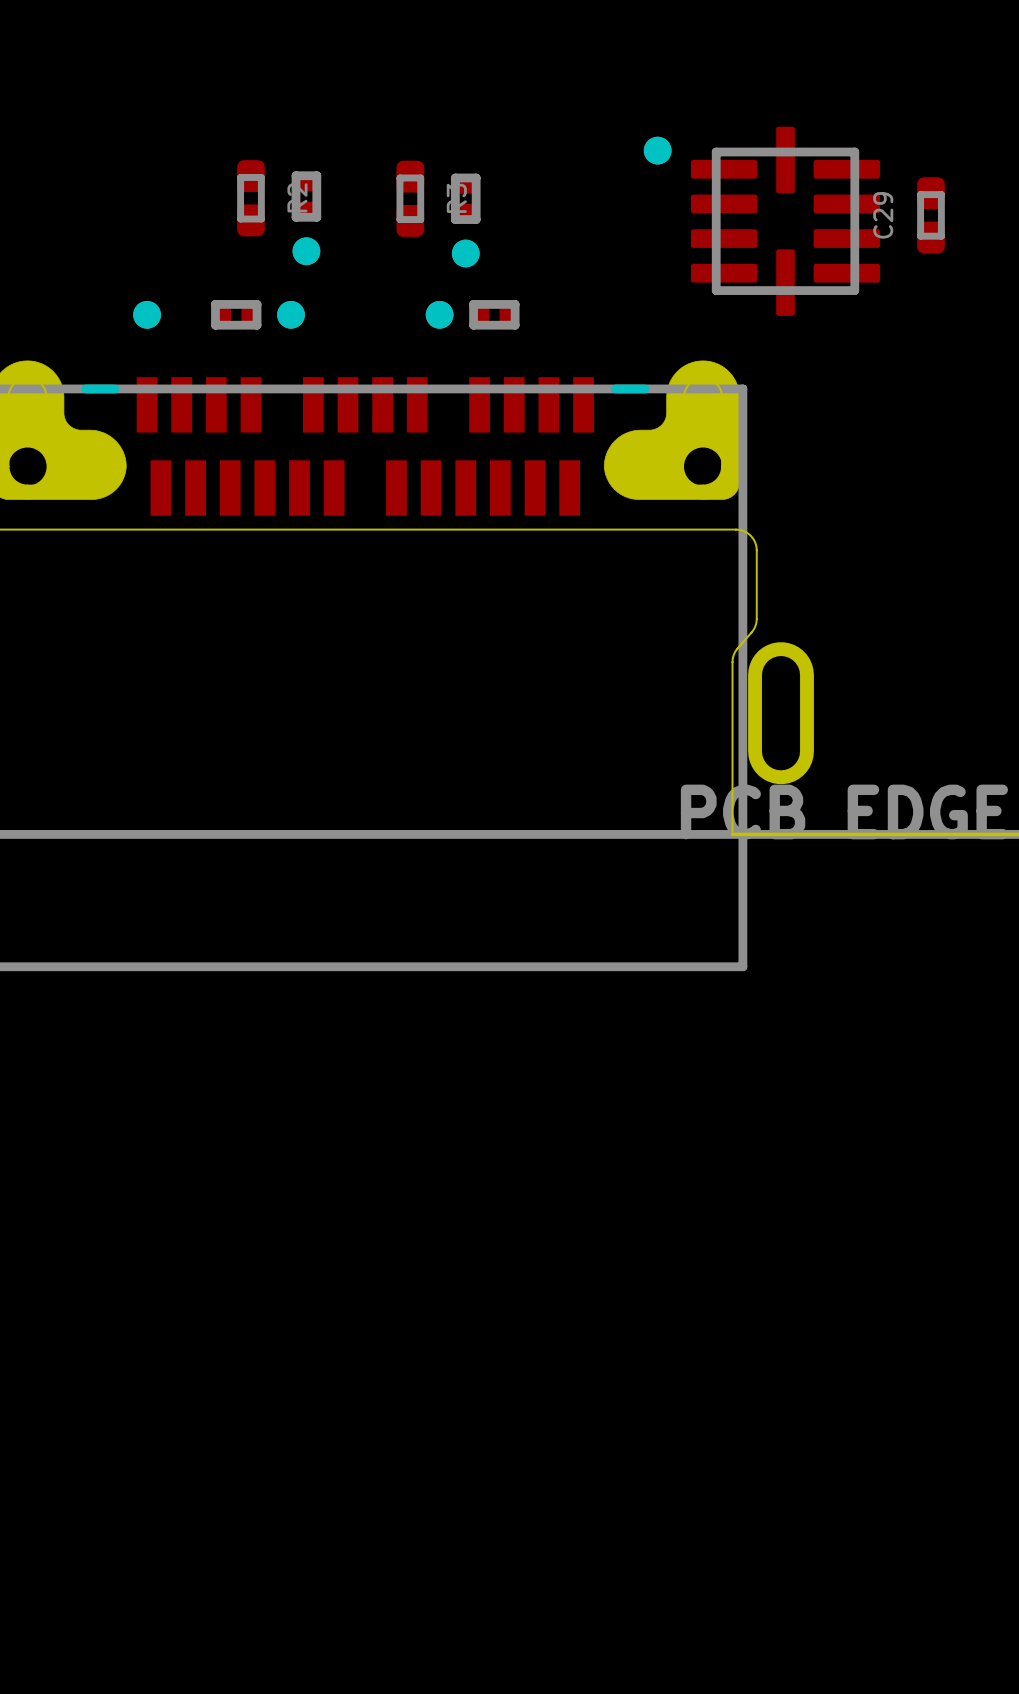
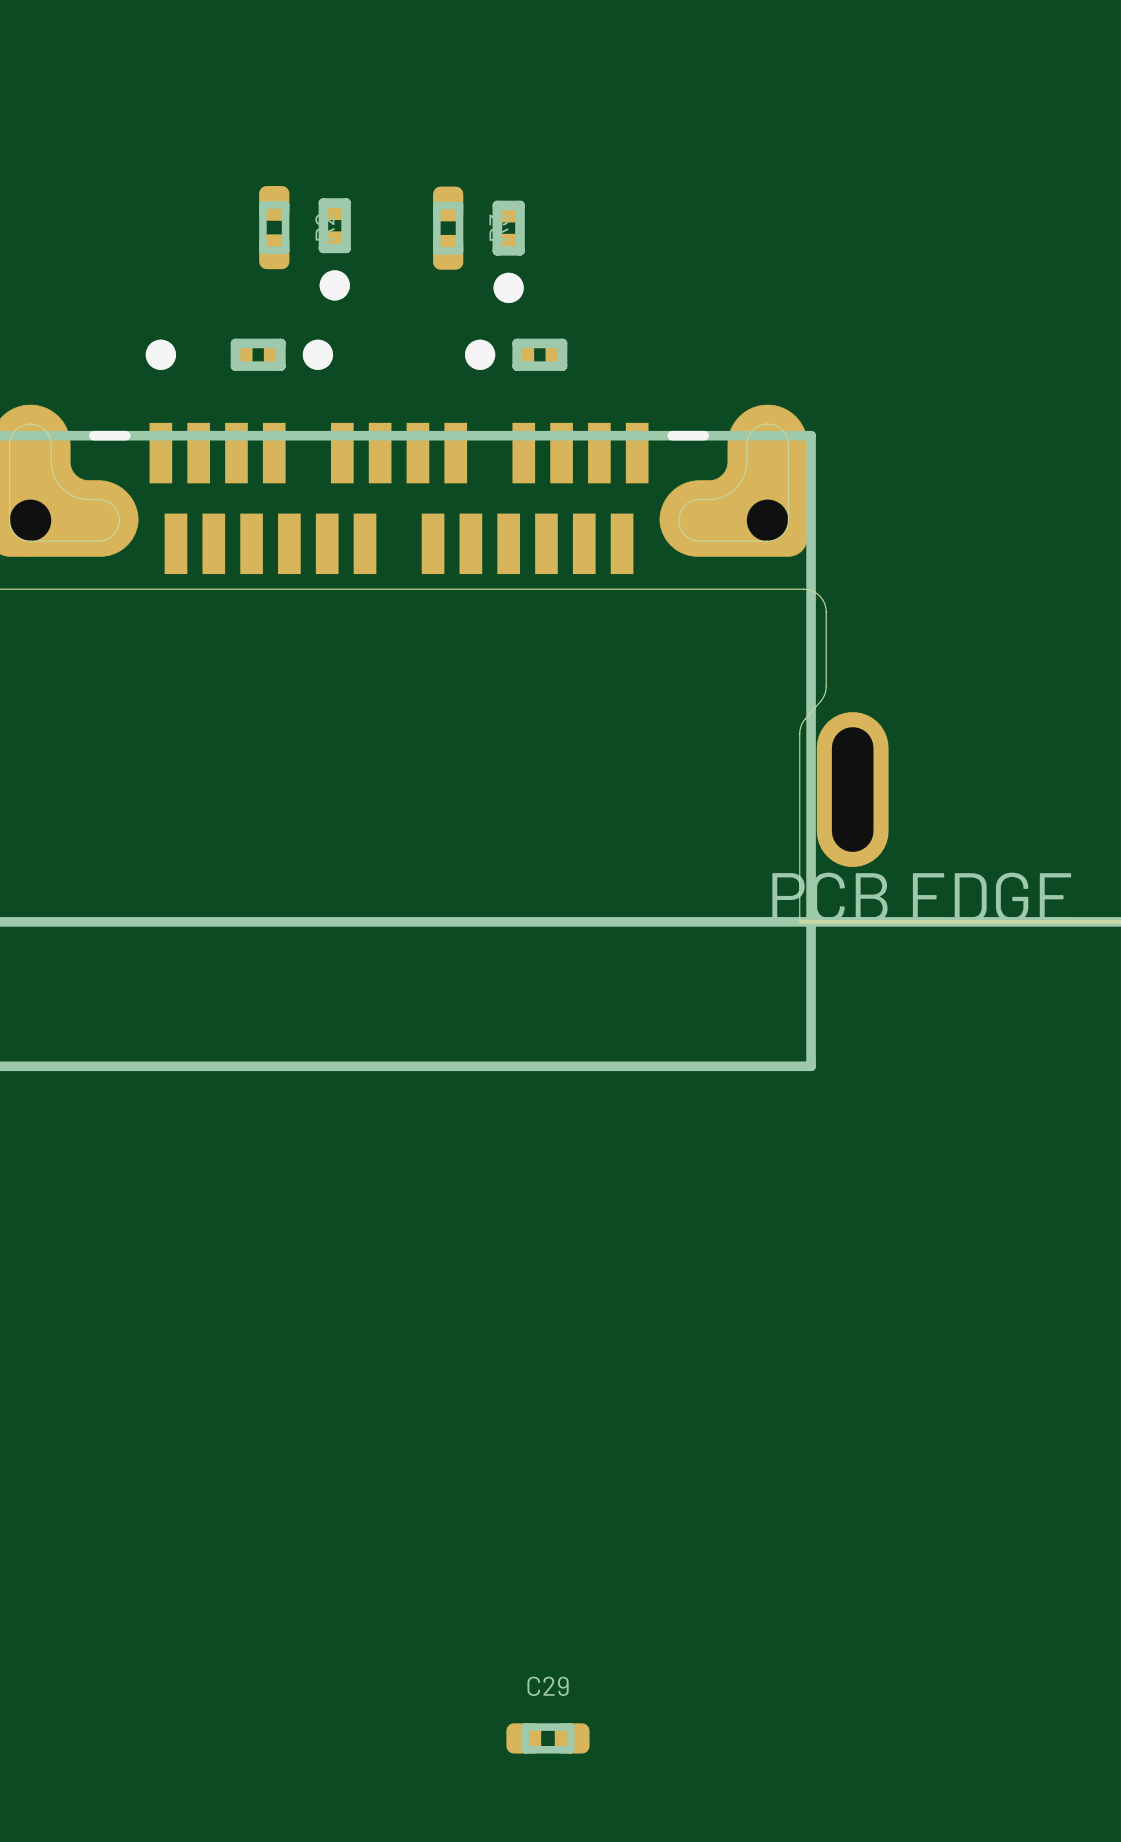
C29 rotation: 0° (931, 215) -> 90° clockwise (547, 1738)
C29 position: (931, 215) -> (547, 1738)
part: (761, 221) -> none

